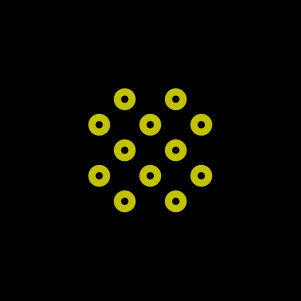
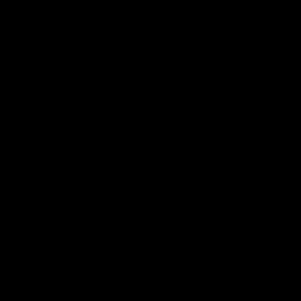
part: (150, 150) -> none

